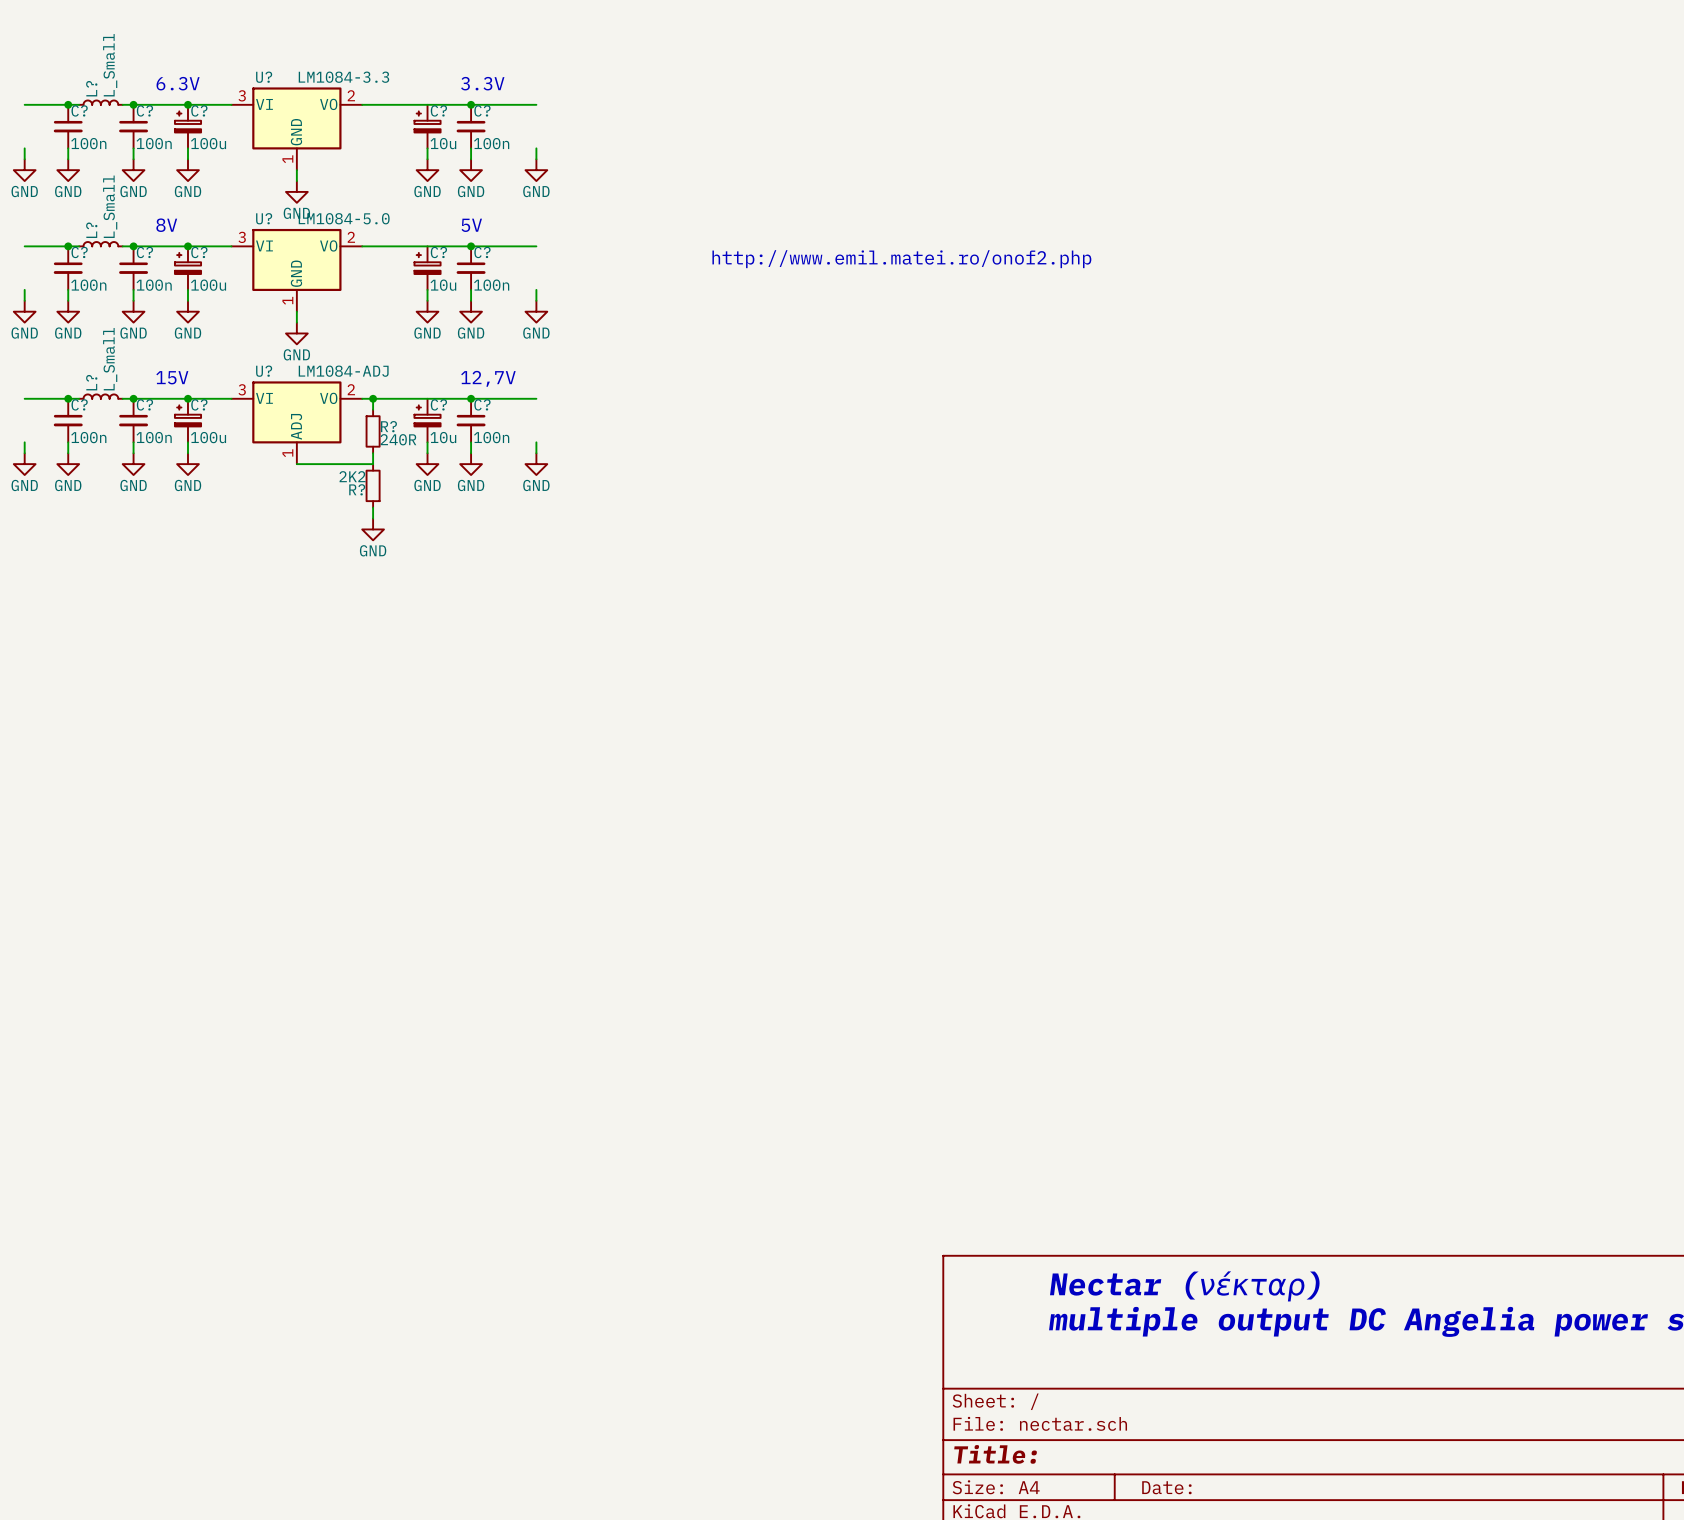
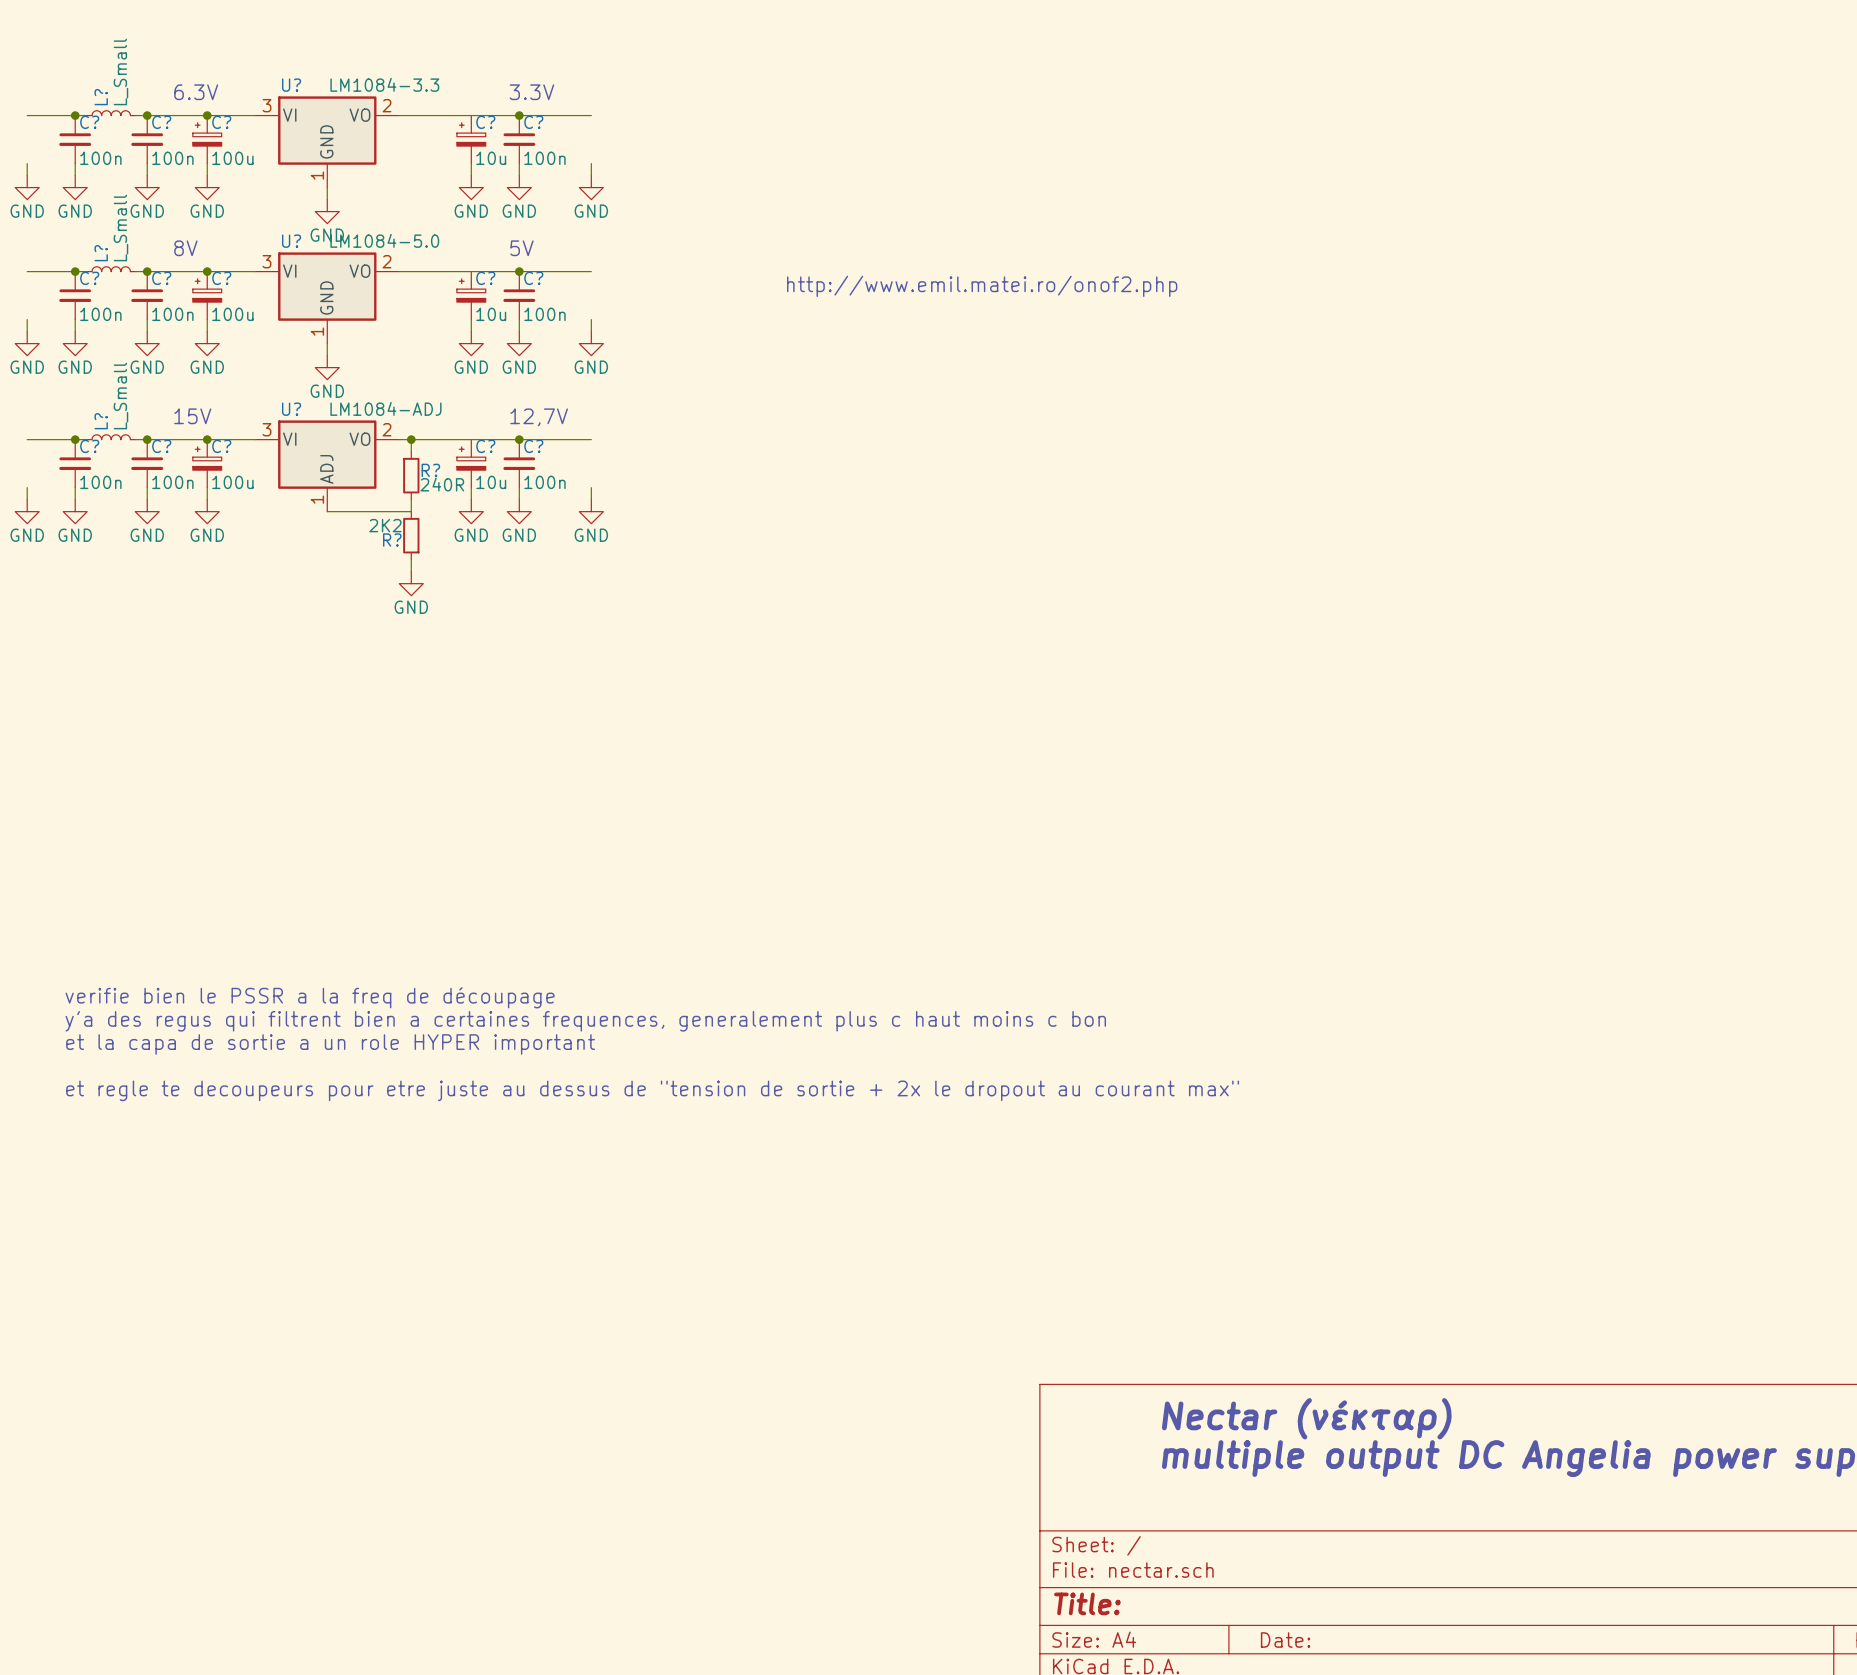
text: none -> verifie bien le PSSR a la freq de découpage (310, 997)
text: none -> y'a des regus qui filtrent bien a certaines frequences, generalement plus c haut moins c bon (585, 1021)
text: none -> et la capa de sortie a un role HYPER important (330, 1044)
text: none -> et regle te decoupeurs pour etre juste au dessus de "tension de sortie + 2x le dropout au courant max" (652, 1090)

